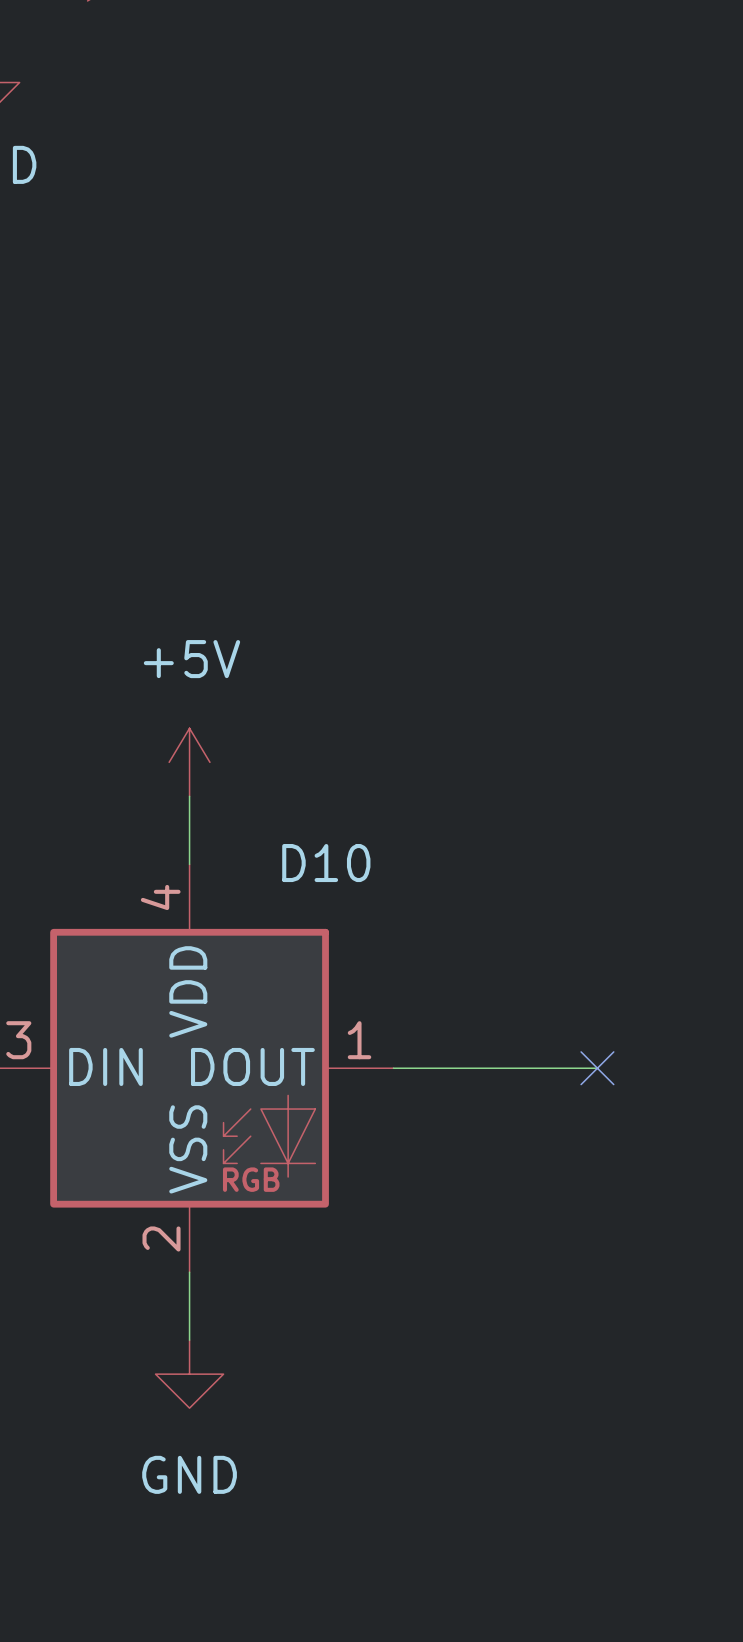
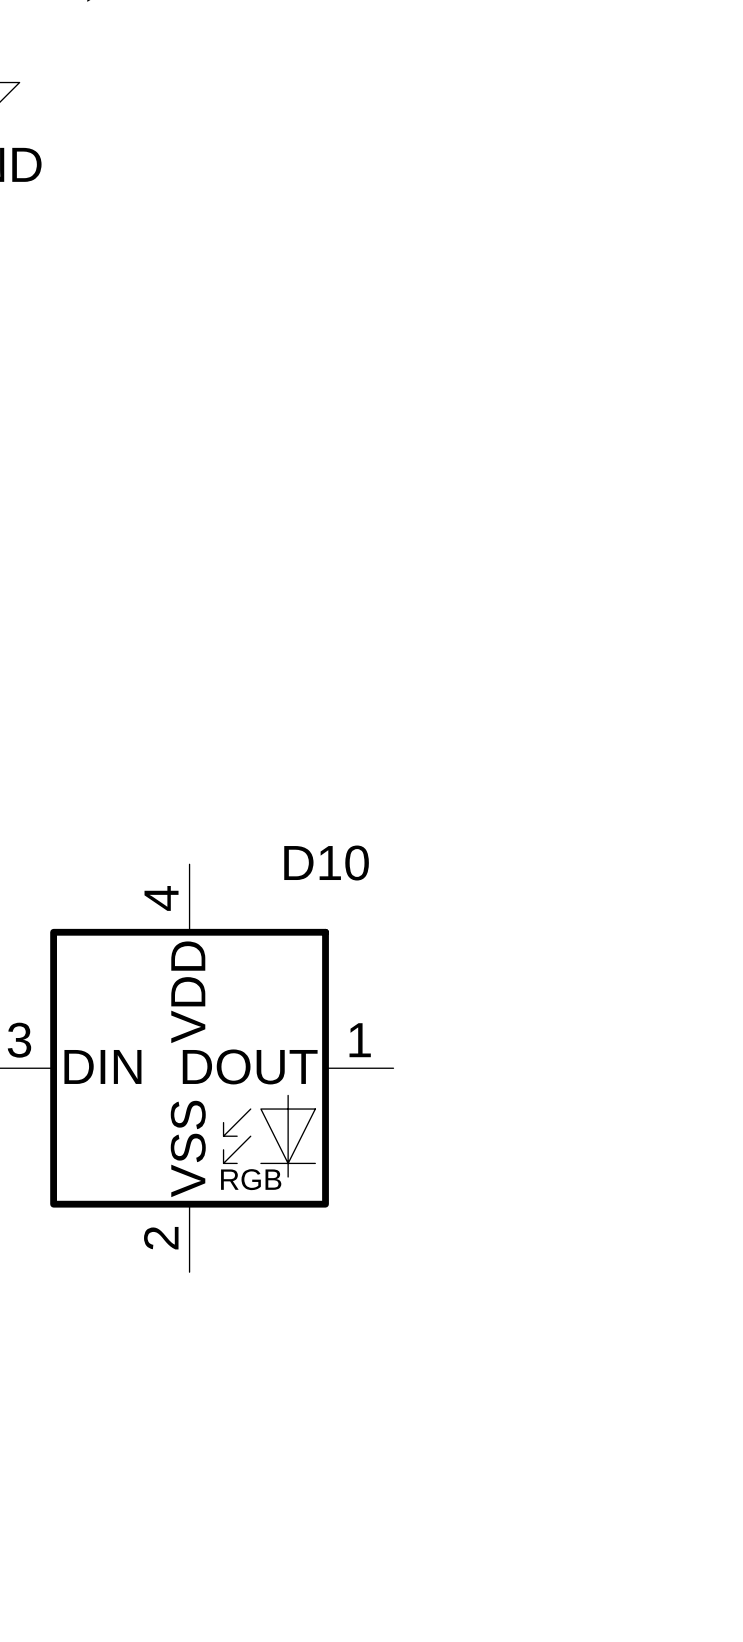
power symbol: +5V (189, 762) -> none
wire: (189, 796) (189, 864) -> none
wire: (393, 1068) (597, 1068) -> none
no-connect mark: (597, 1068) -> none
wire: (189, 1272) (189, 1340) -> none
power symbol: GND (189, 1374) -> none

